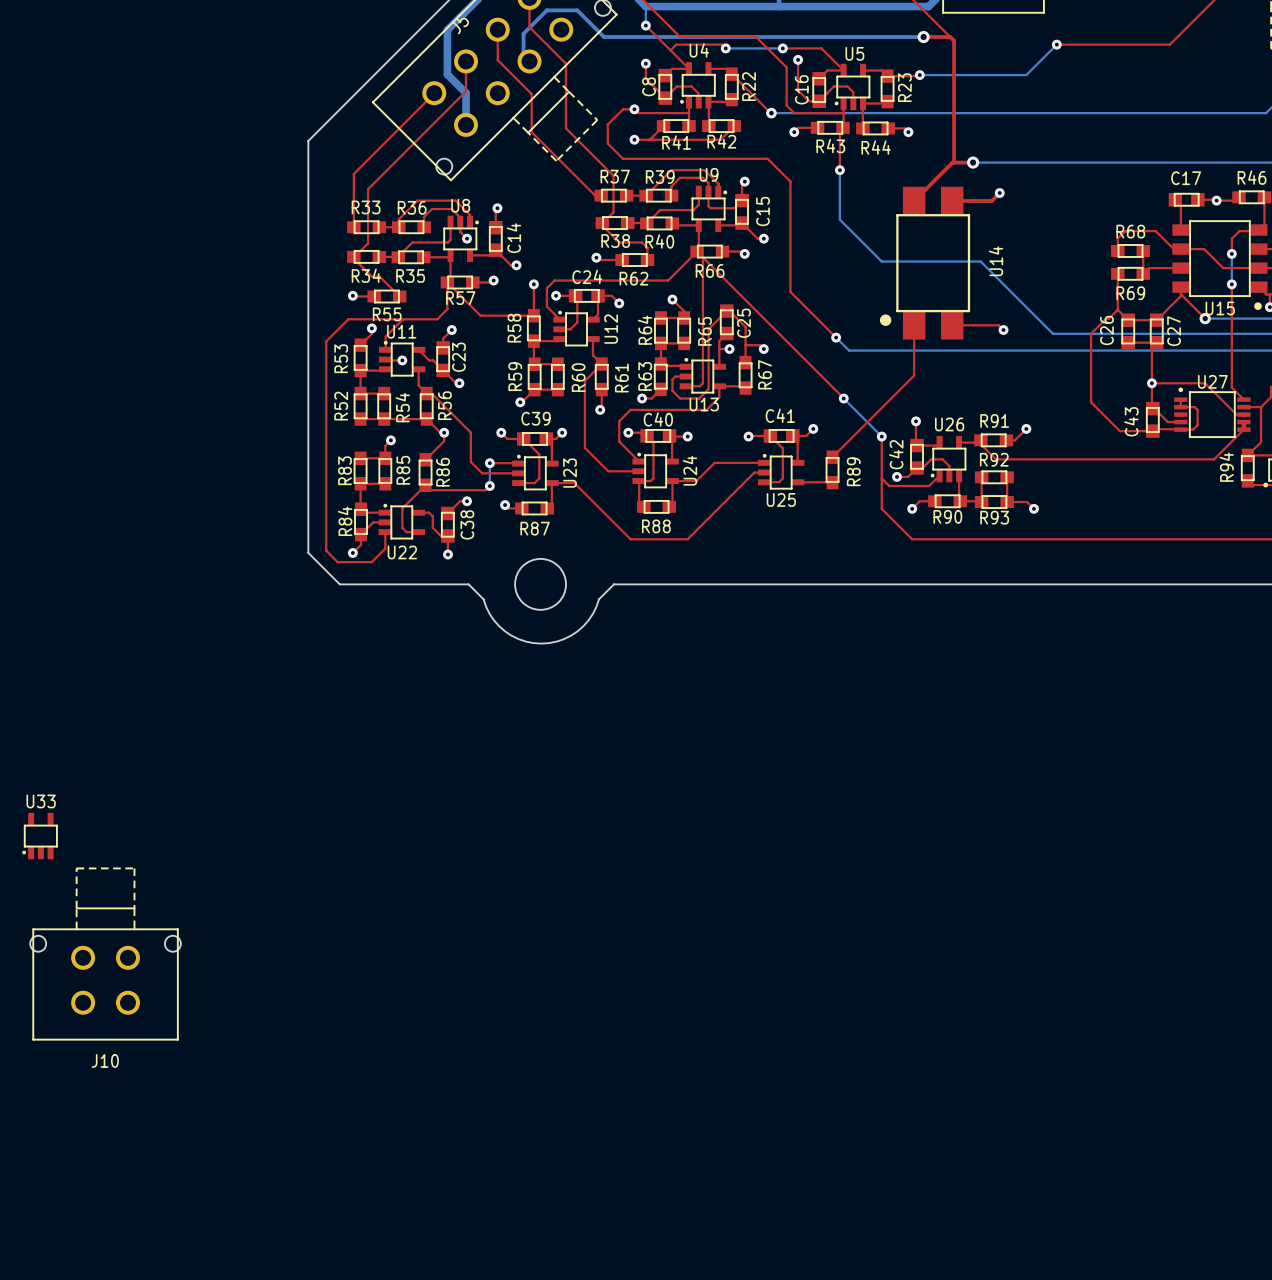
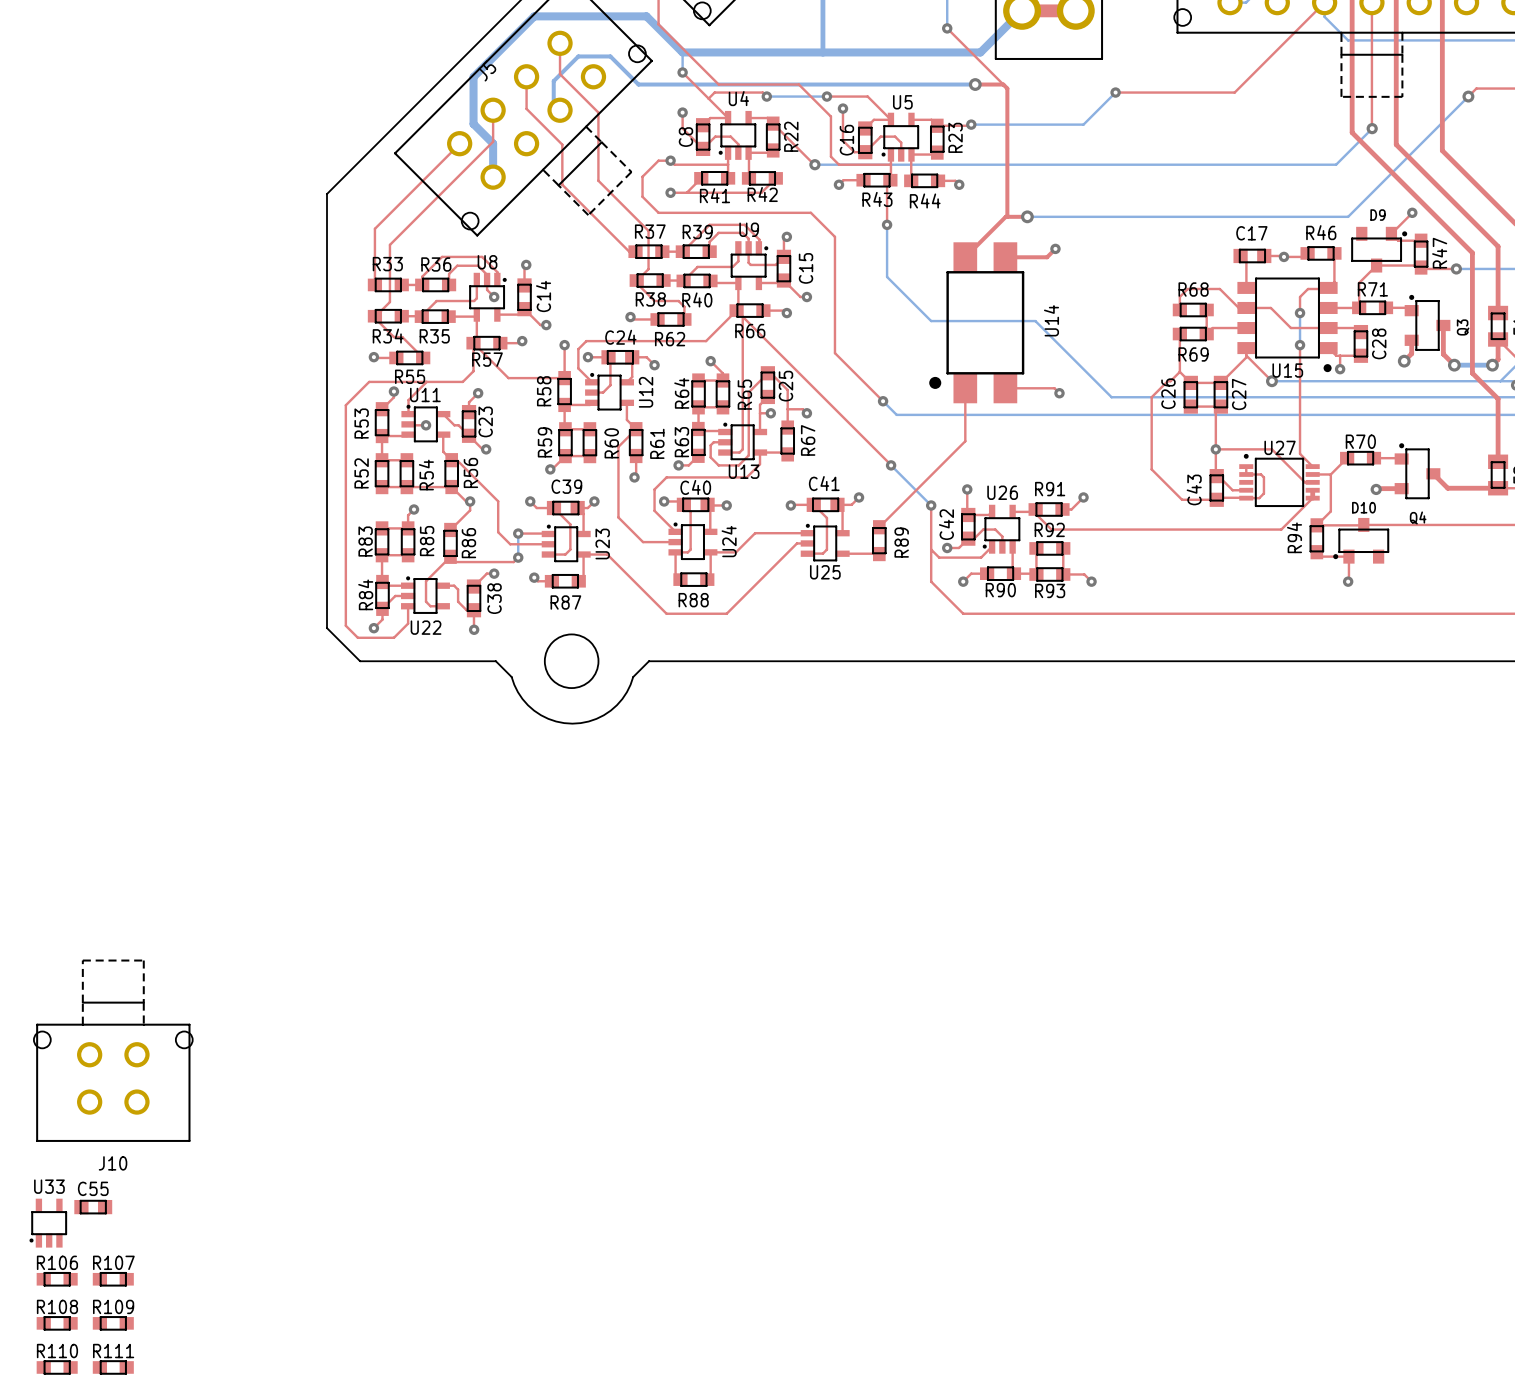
U33 position: (40, 836) -> (48, 1223)
C55: none -> (93, 1207)
R106: none -> (57, 1279)
R107: none -> (113, 1279)
R108: none -> (57, 1323)
R109: none -> (113, 1323)
R110: none -> (57, 1367)
R111: none -> (113, 1367)

